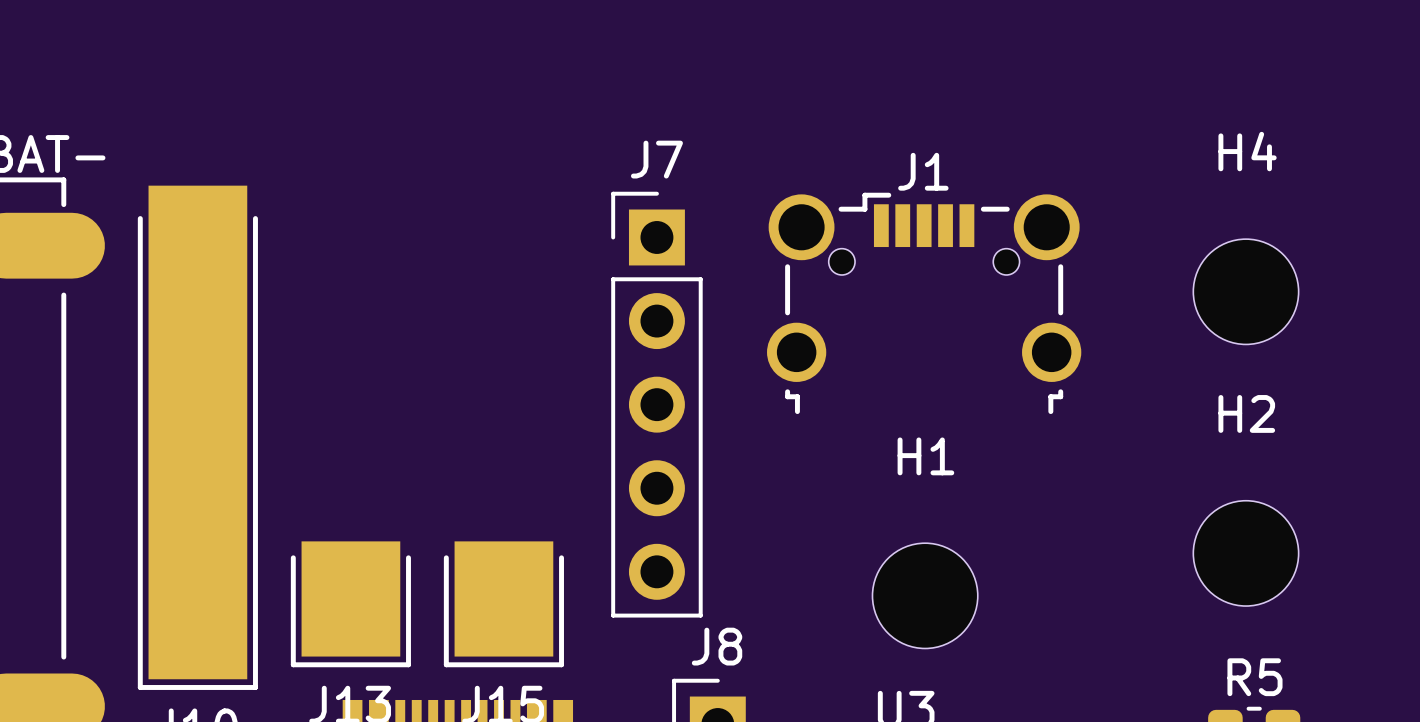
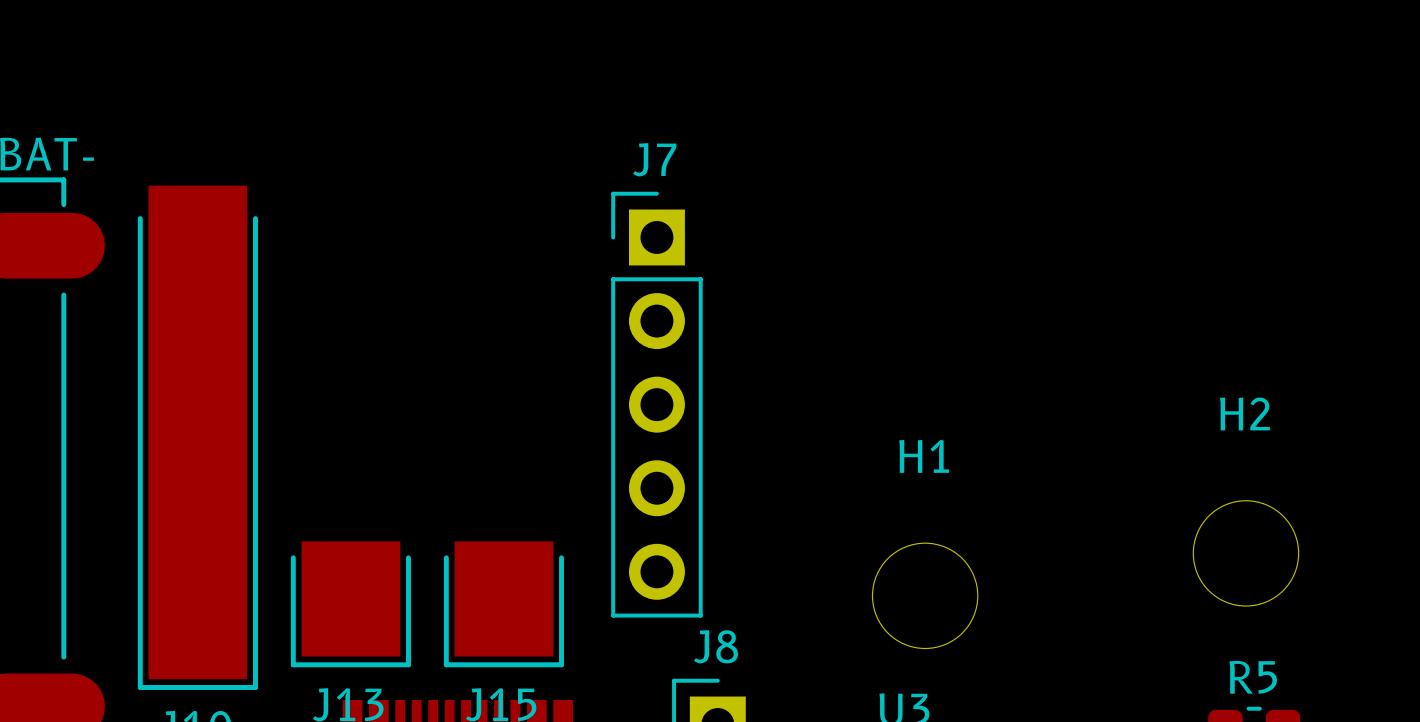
H4: (1245, 291) -> none
J1: (924, 303) -> none

